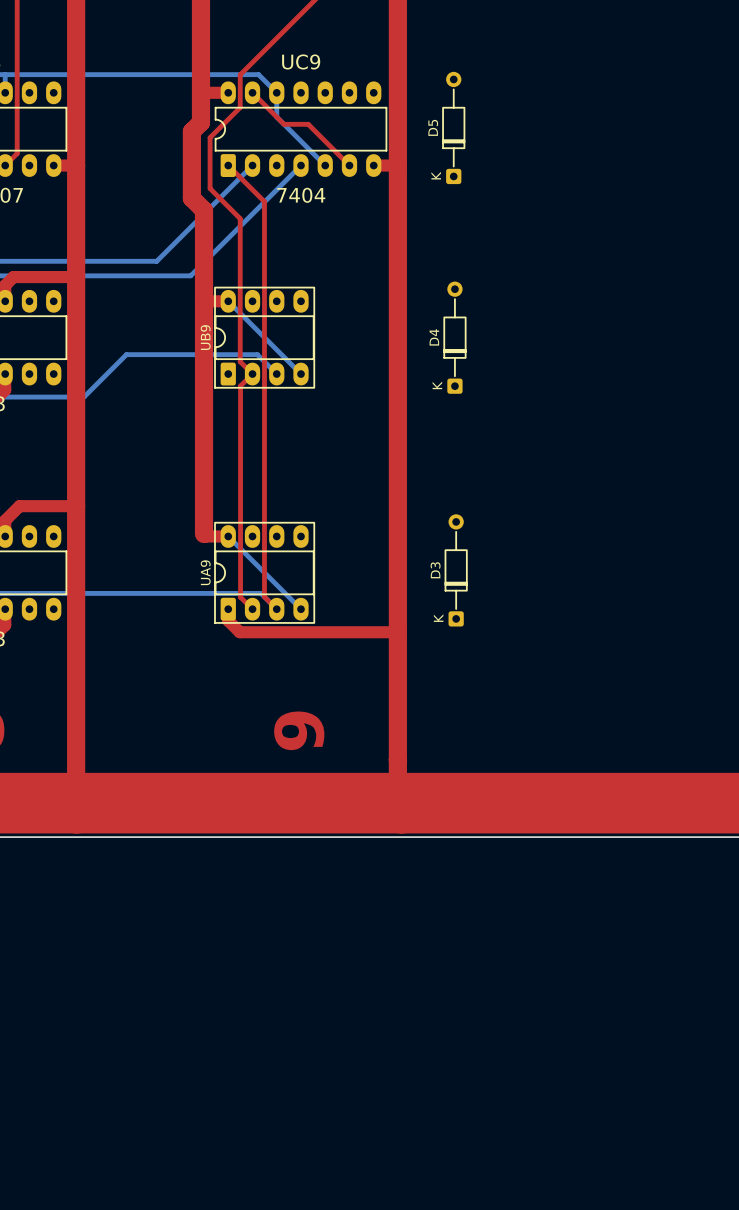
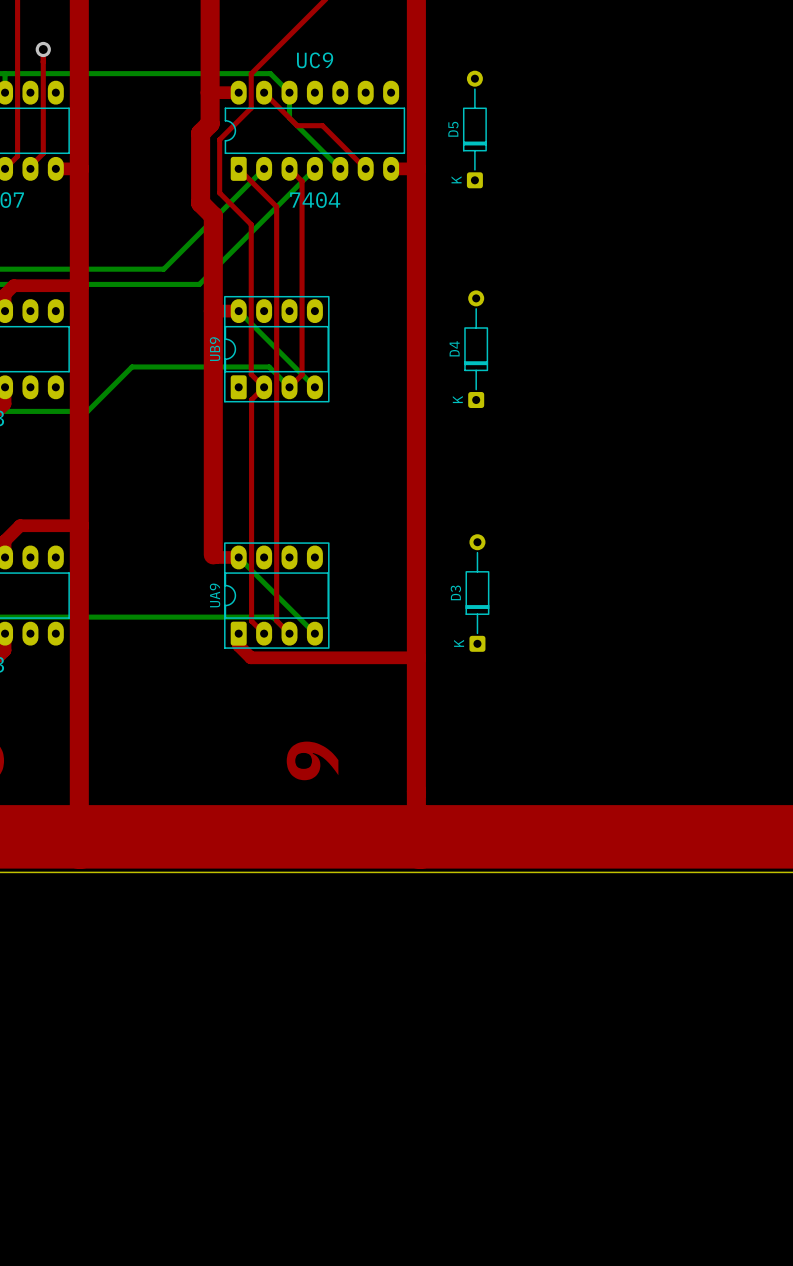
top track: none -> (43, 49) (43, 153) (27, 168) (30, 168)
via: none -> (43, 49)
top track: none -> (289, 168) (302, 181) (302, 374) (289, 387)

